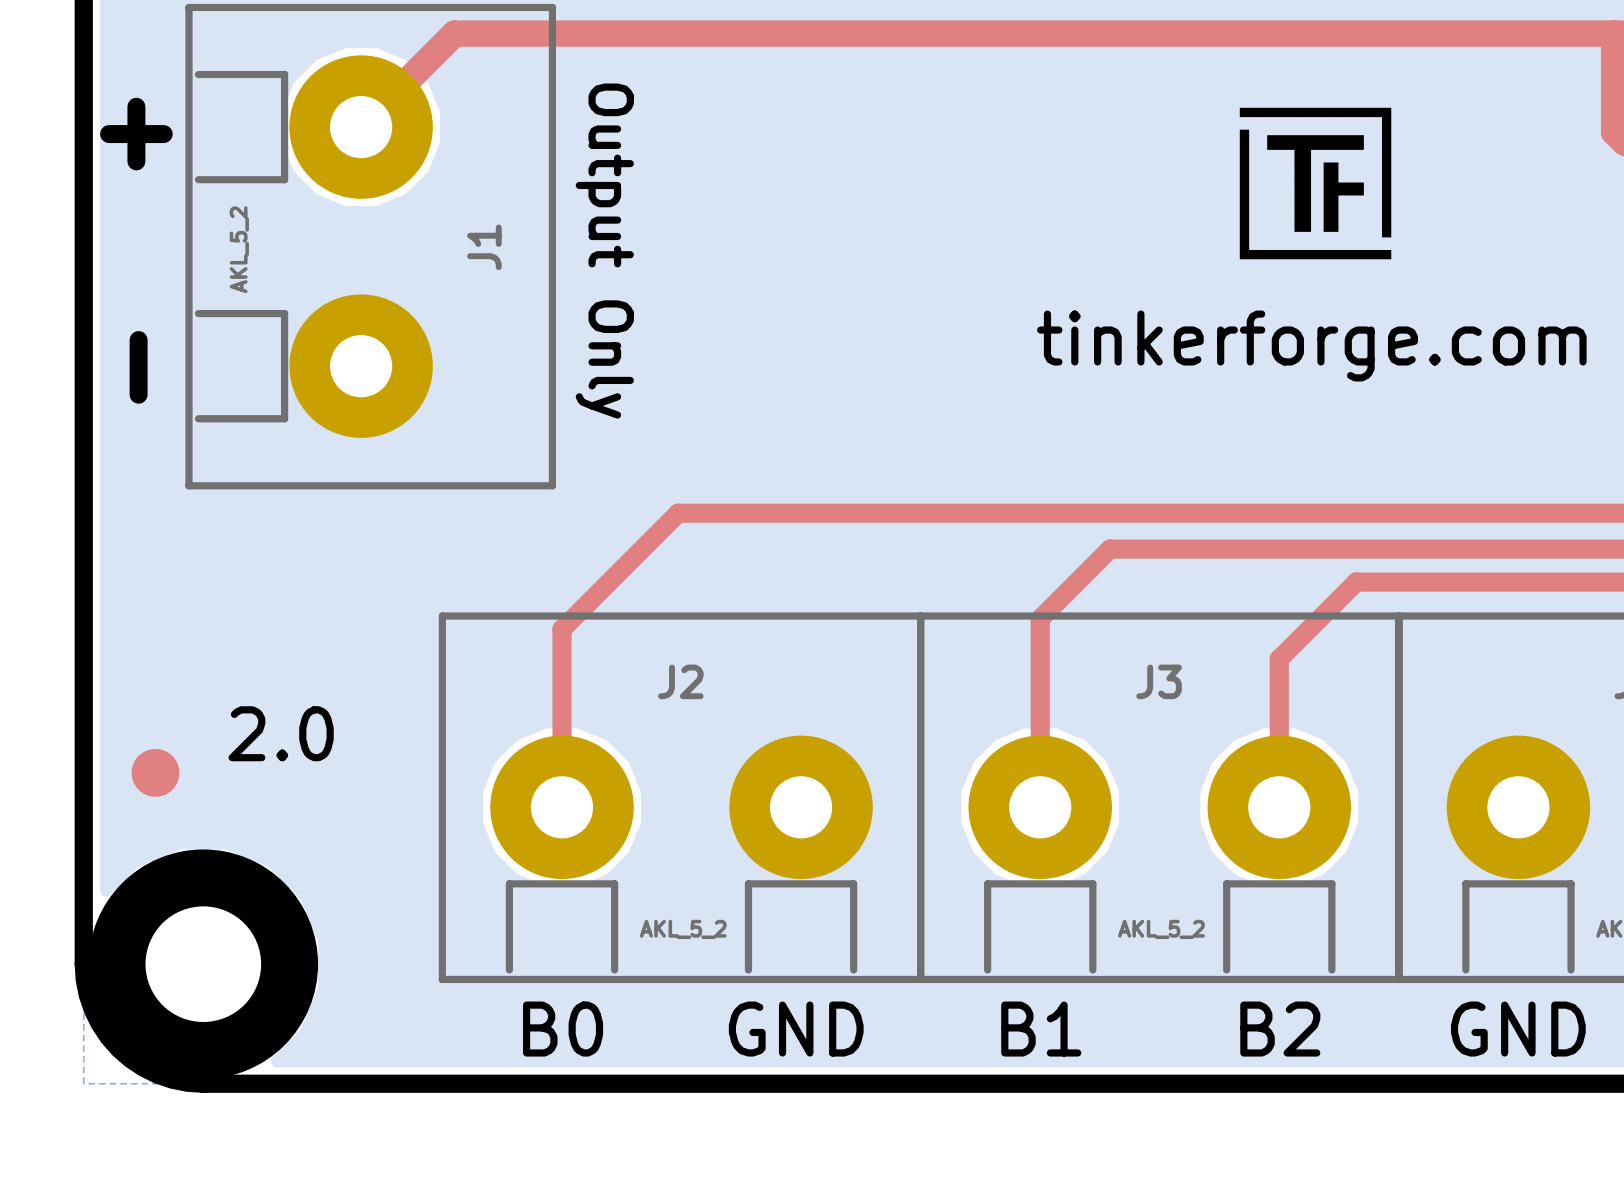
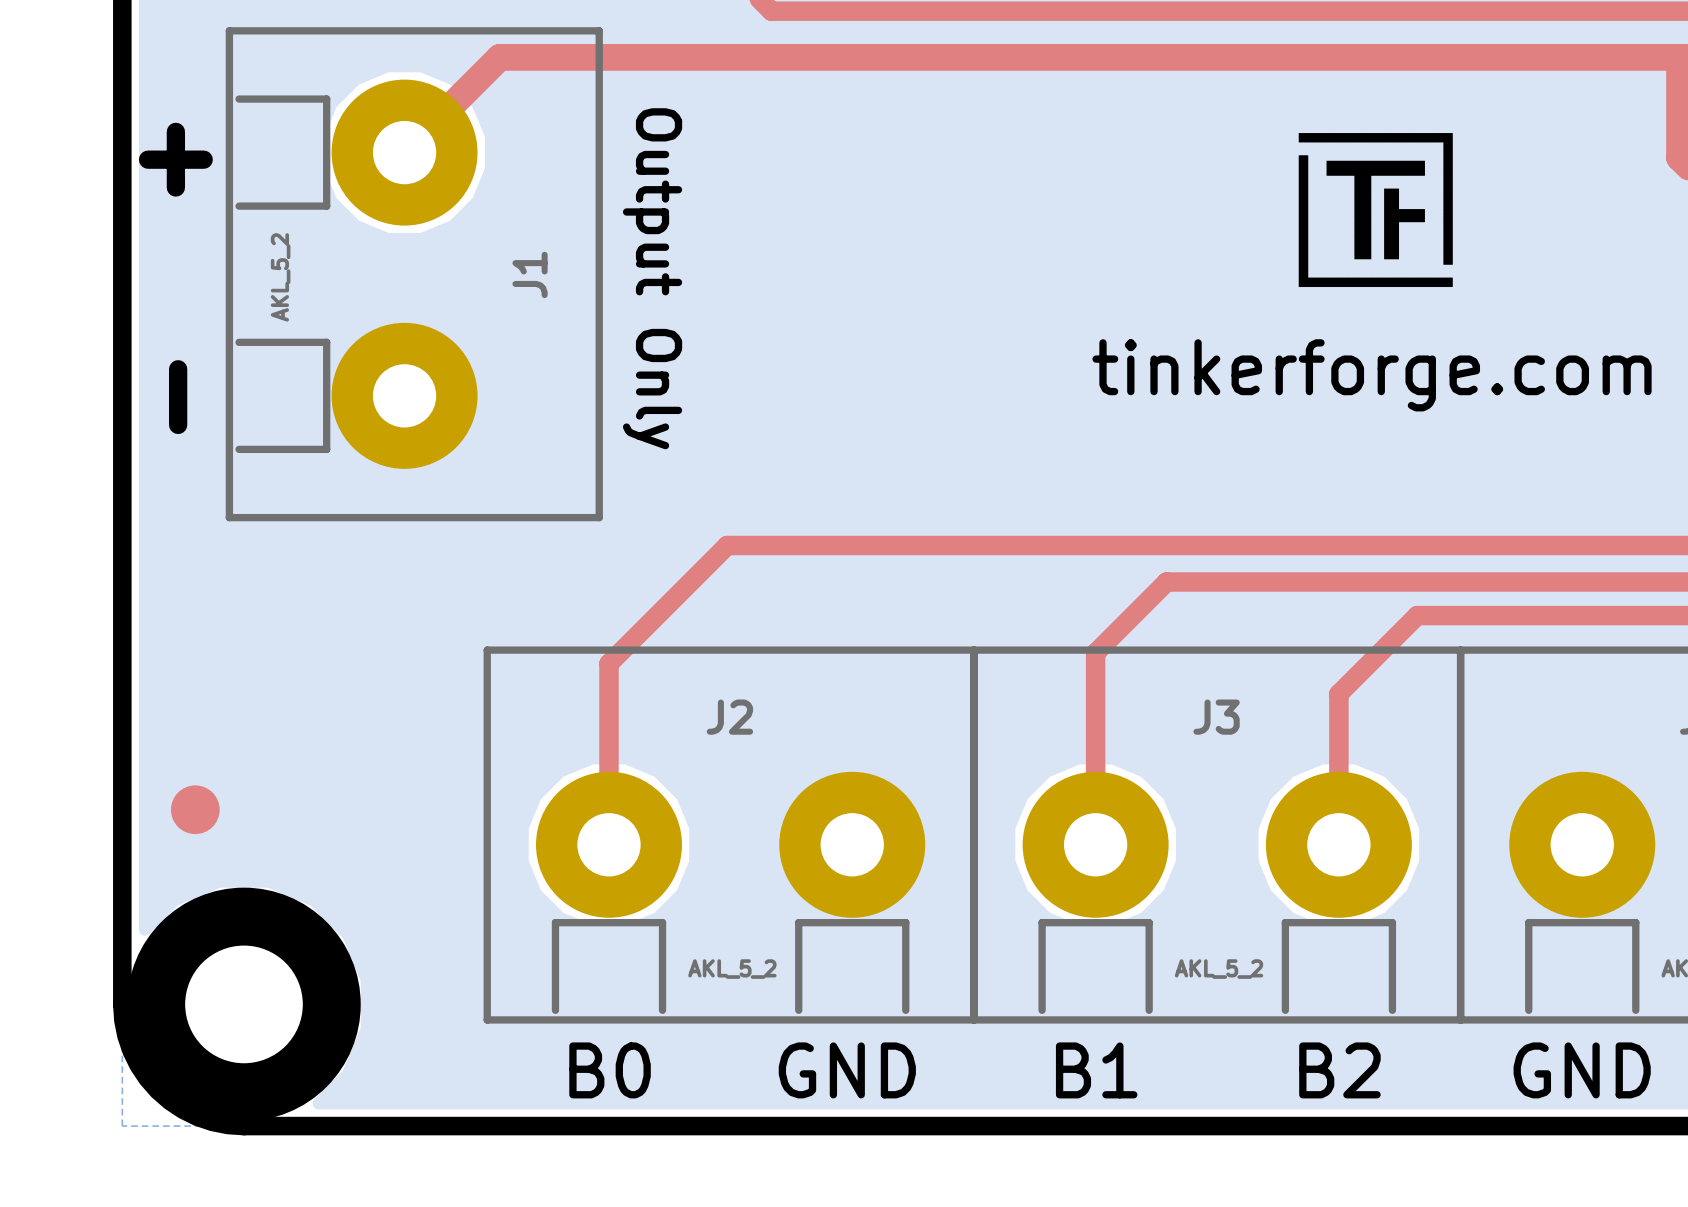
text: 2.0 (281, 733) -> none

